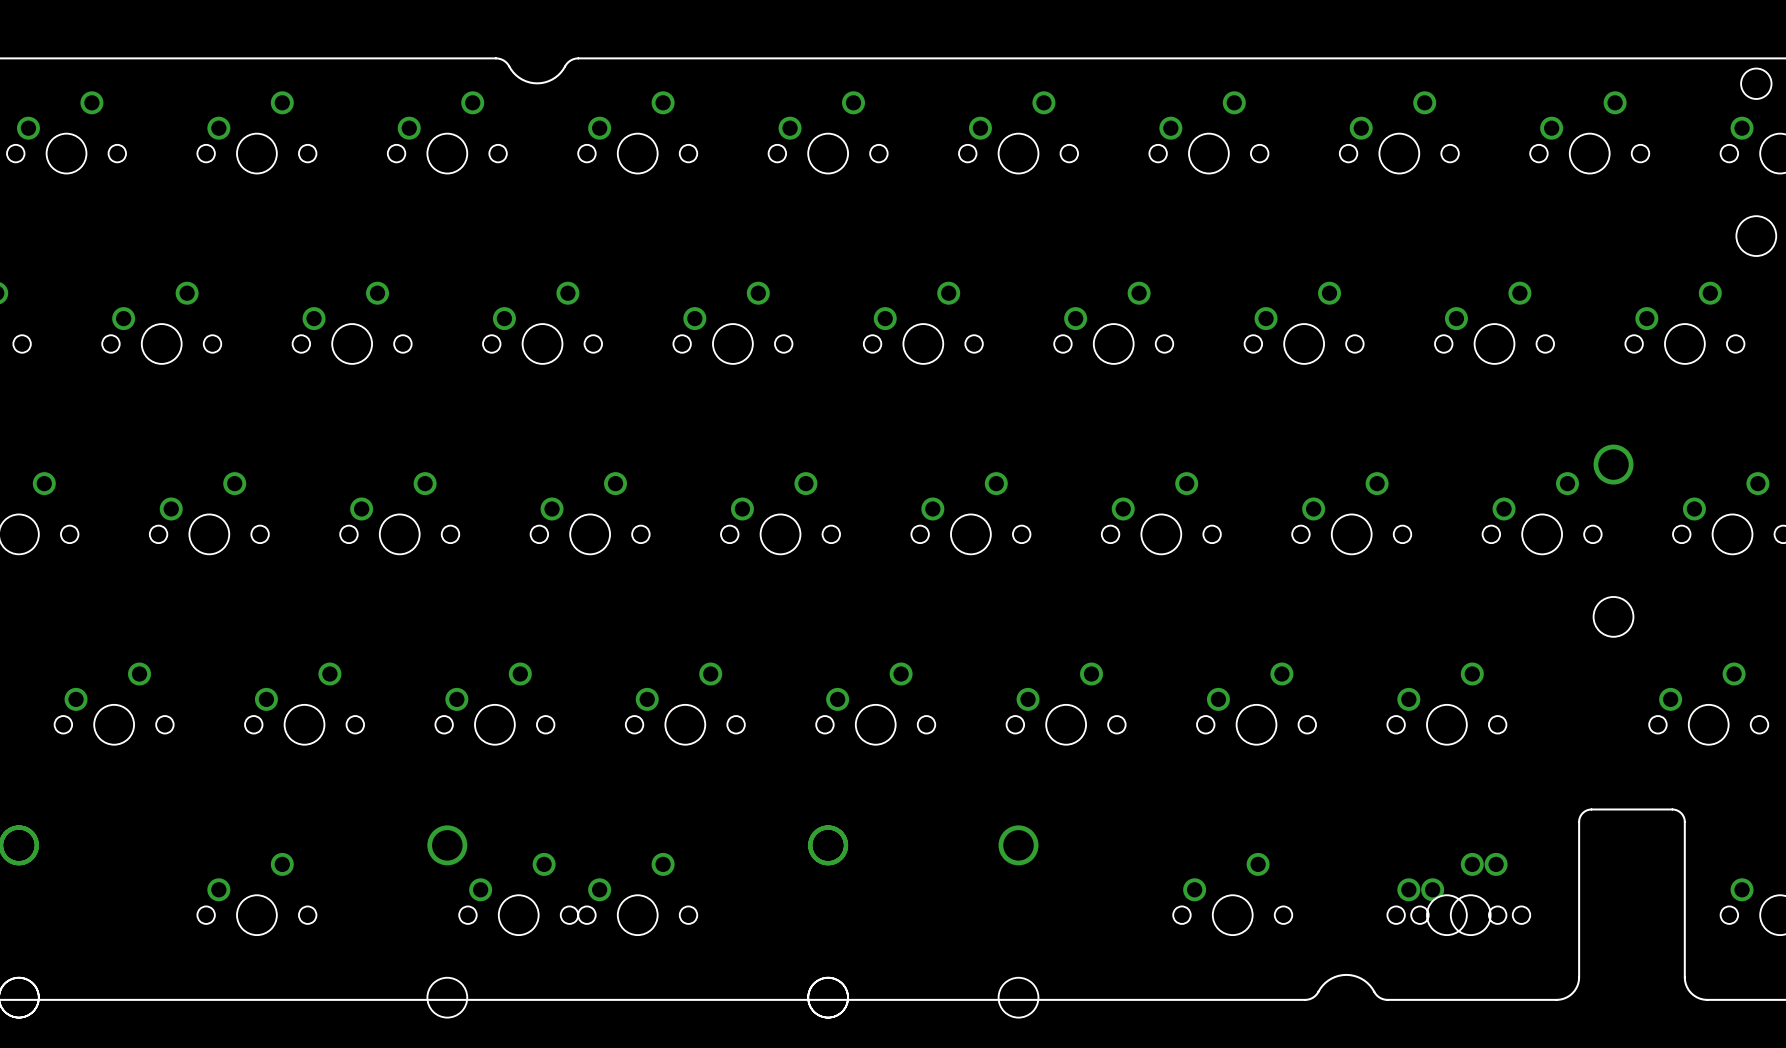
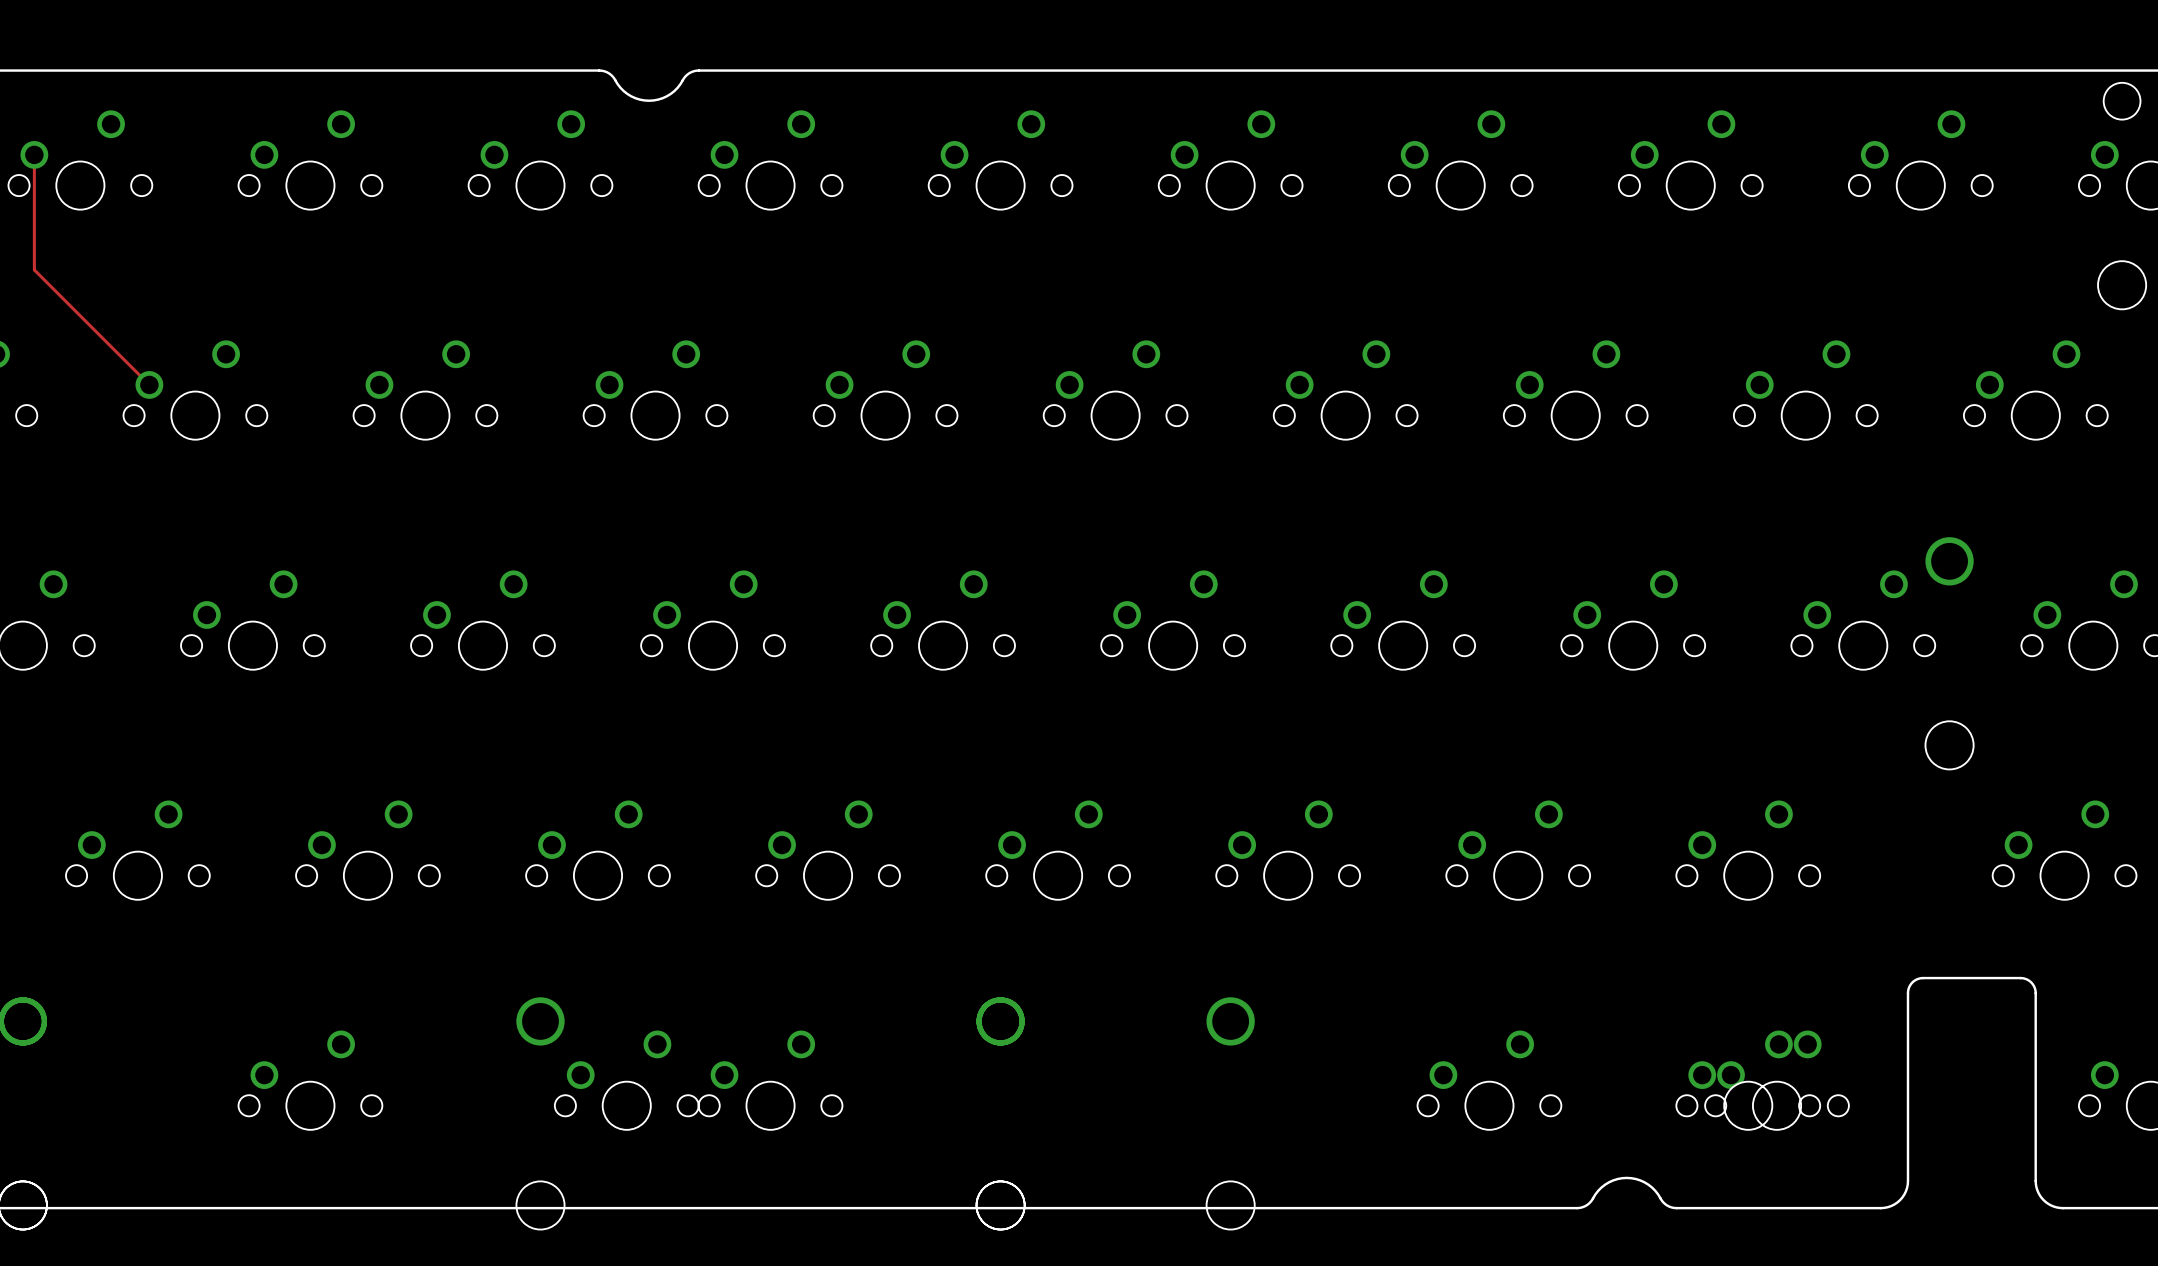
track: none -> (34, 154) (34, 269) (149, 384)

